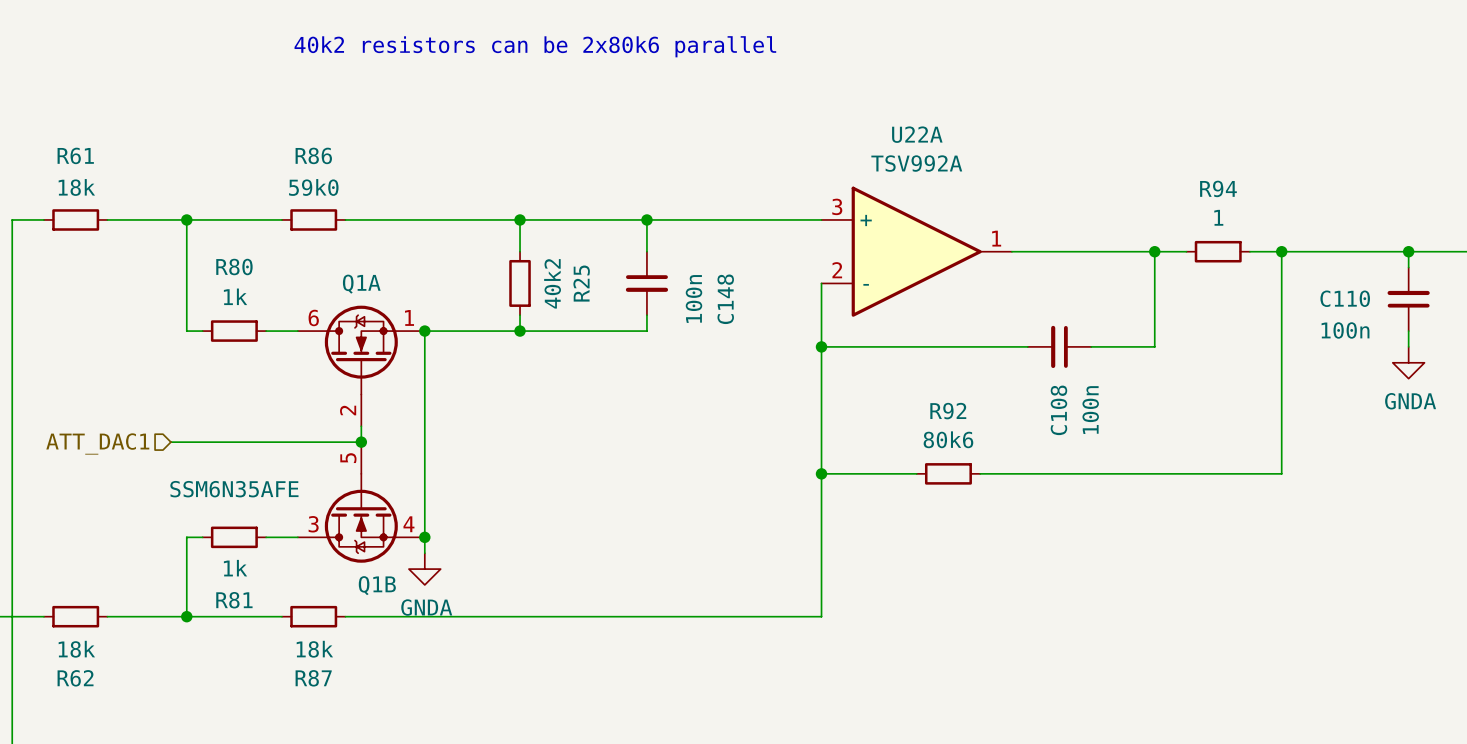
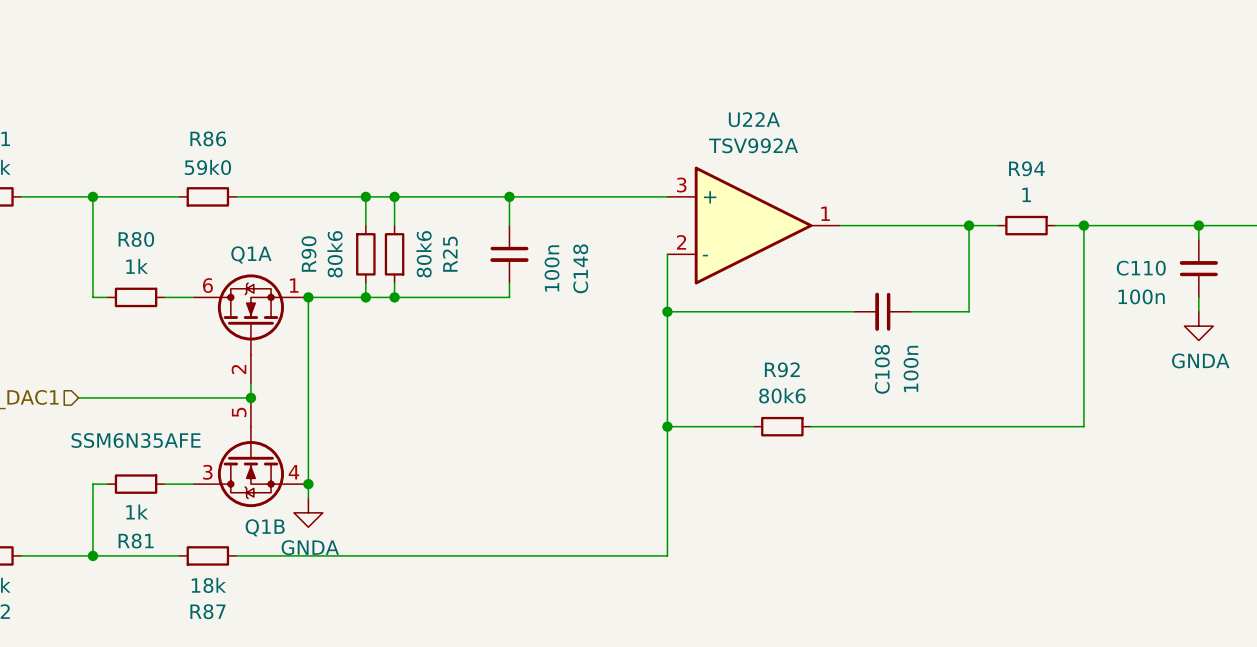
text: 40k2 resistors can be 2x80k6 parallel (535, 46) -> none
wire: none -> (365, 196) (365, 225)
junction: none -> (365, 196)
R90: none -> 80k6 (365, 254)
R25 value: 40k2 (552, 283) -> 80k6 (424, 254)
wire: none -> (365, 283) (365, 297)
junction: none -> (365, 297)

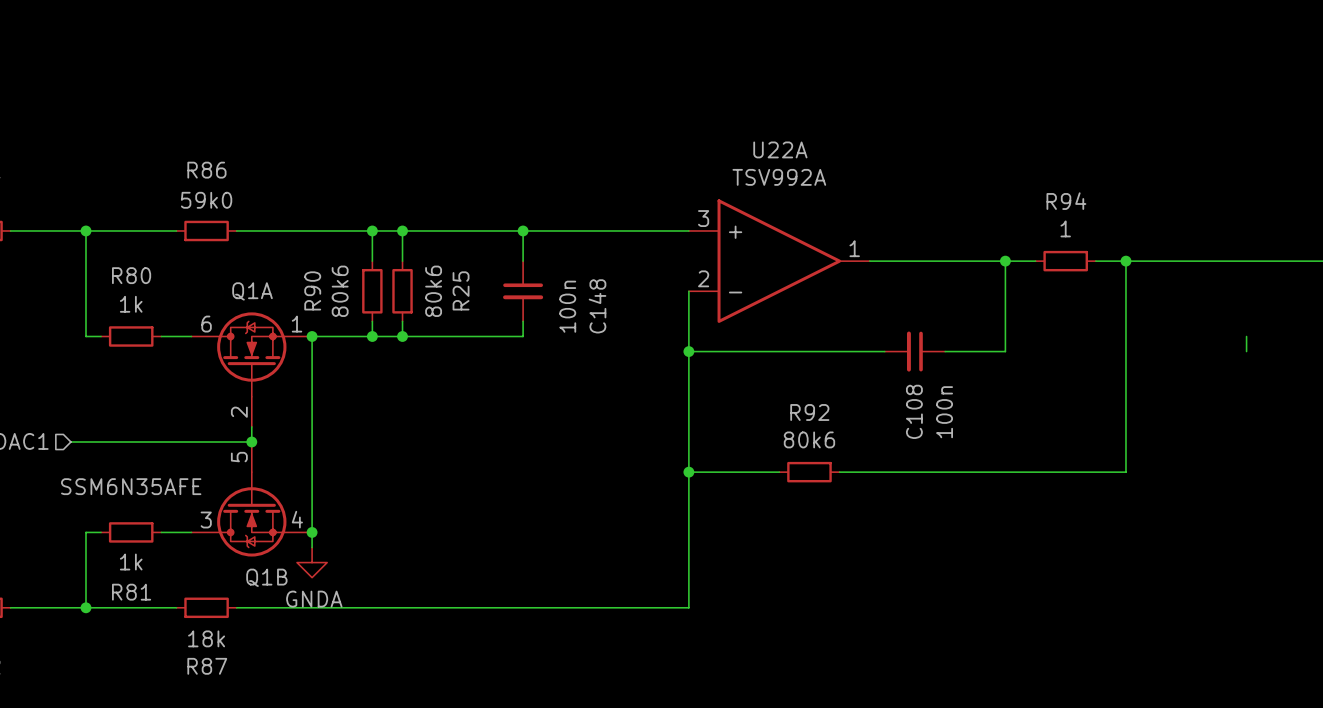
wire: (1198, 225) (1198, 239) -> none
junction: (1198, 225) -> none
C110: 100n (1198, 268) -> none
power symbol: GNDA (1198, 326) -> none

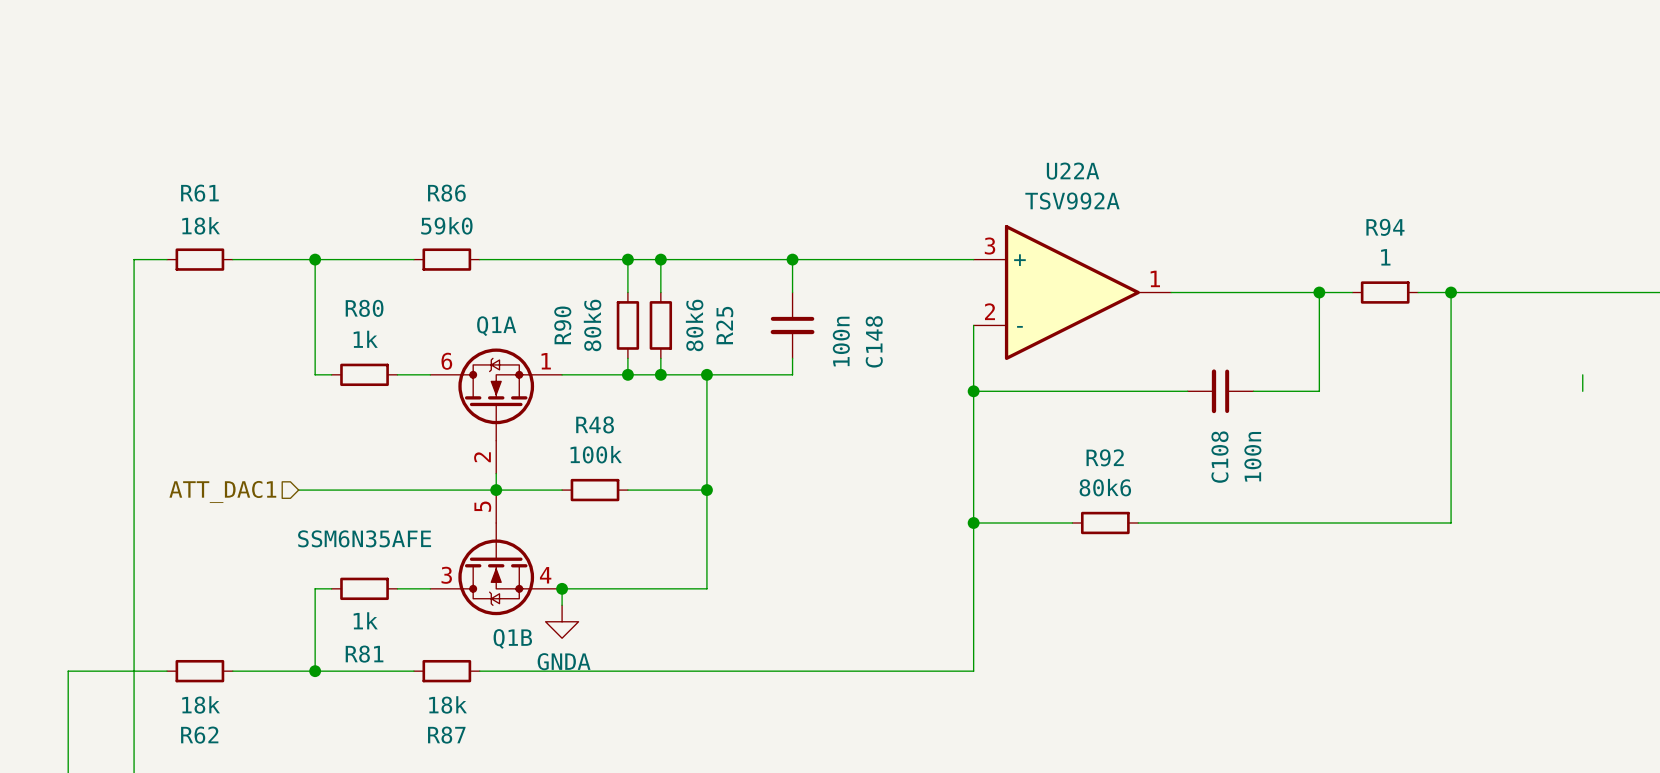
wire: (312, 336) (312, 532) -> (706, 374) (706, 588) (562, 588)
junction: (312, 336) -> none
junction: none -> (706, 374)
wire: none -> (496, 490) (562, 490)
R48: none -> 100k (595, 490)
wire: none -> (627, 490) (706, 490)
junction: none -> (706, 490)

